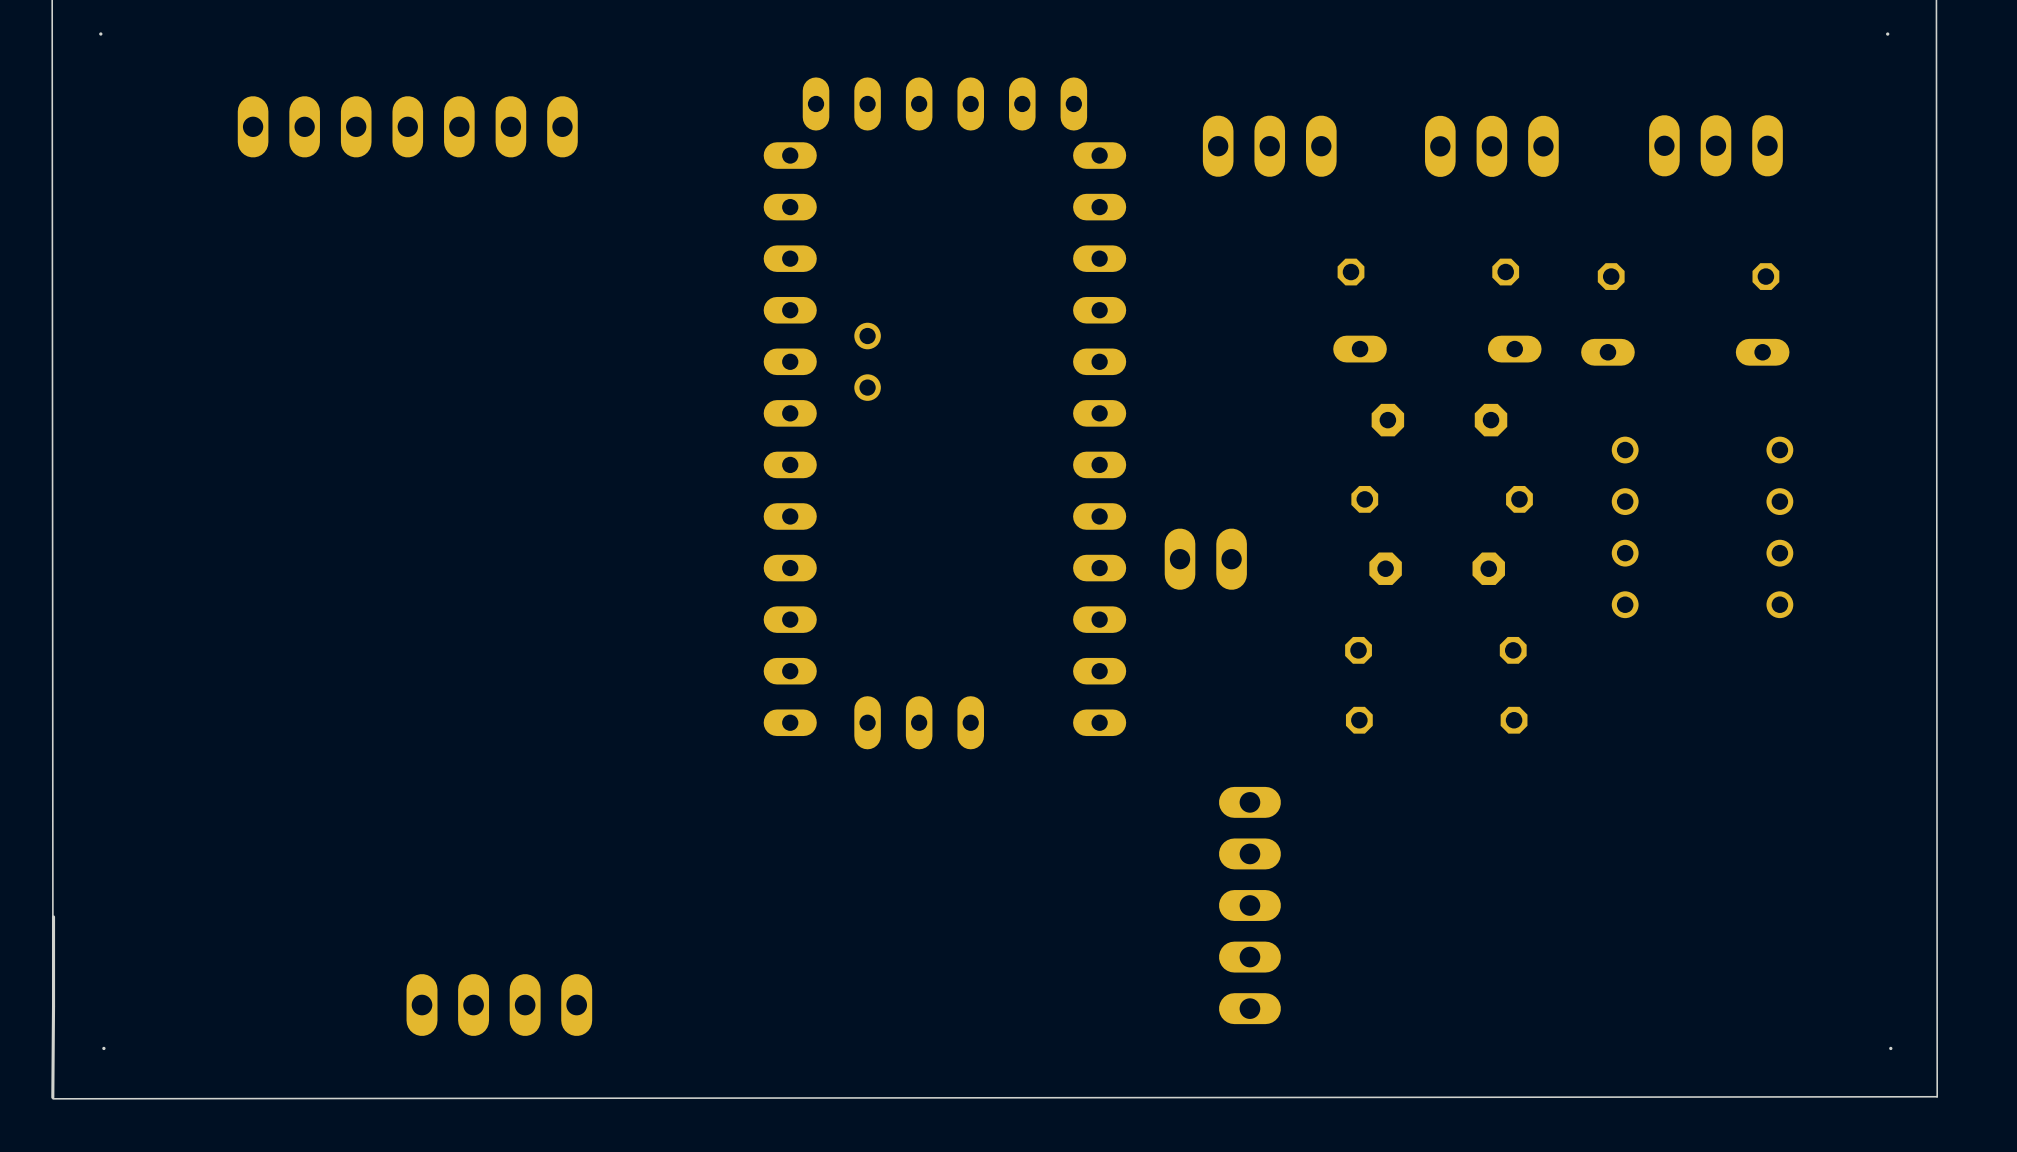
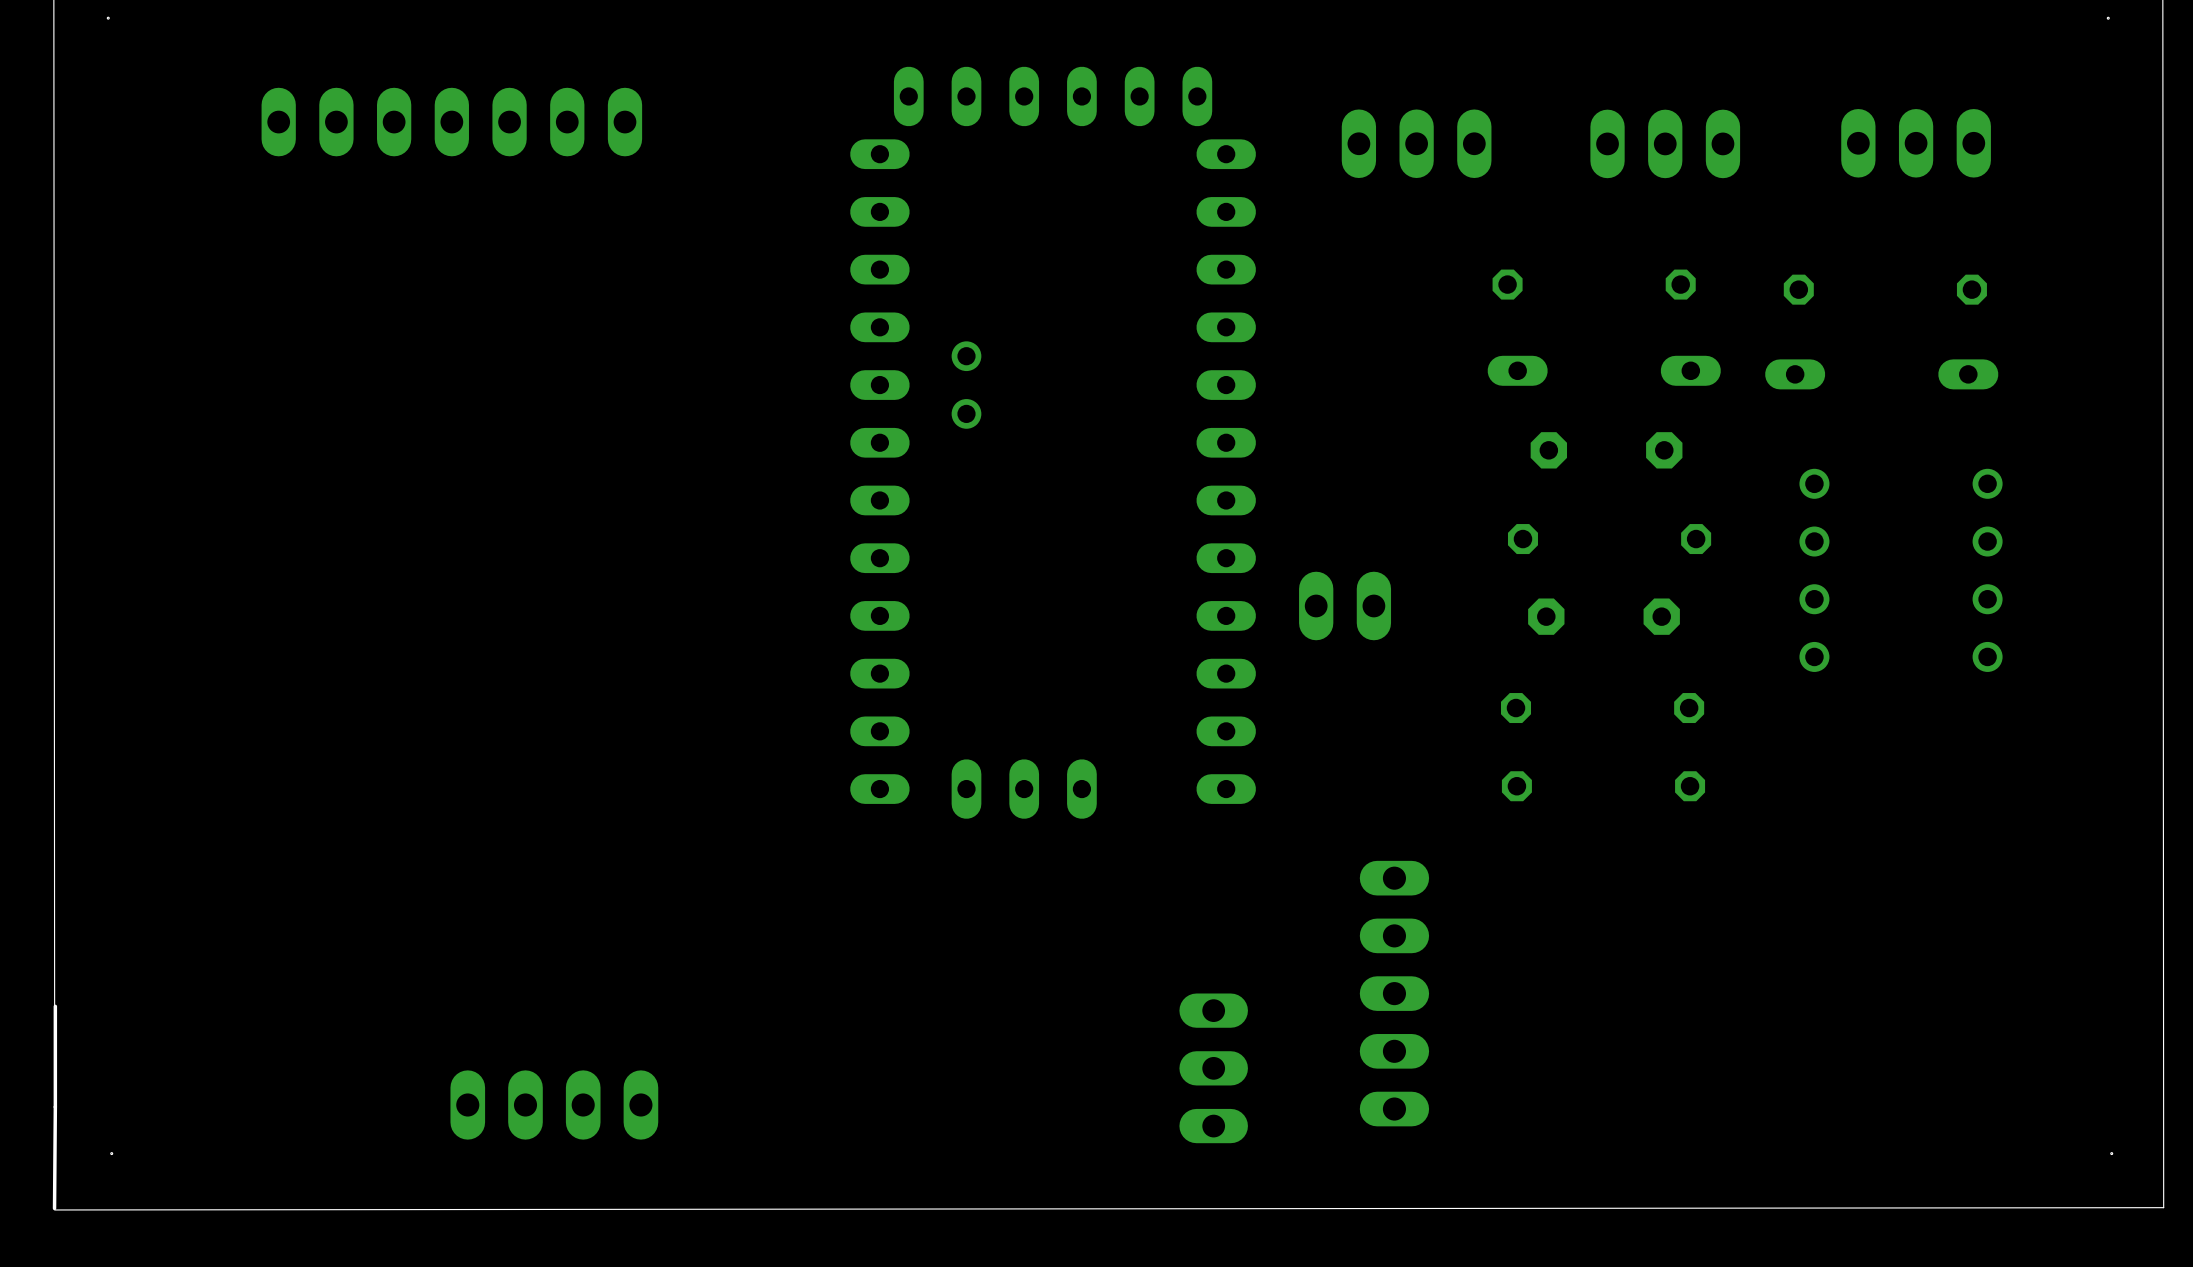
part: none -> (1213, 1068)

